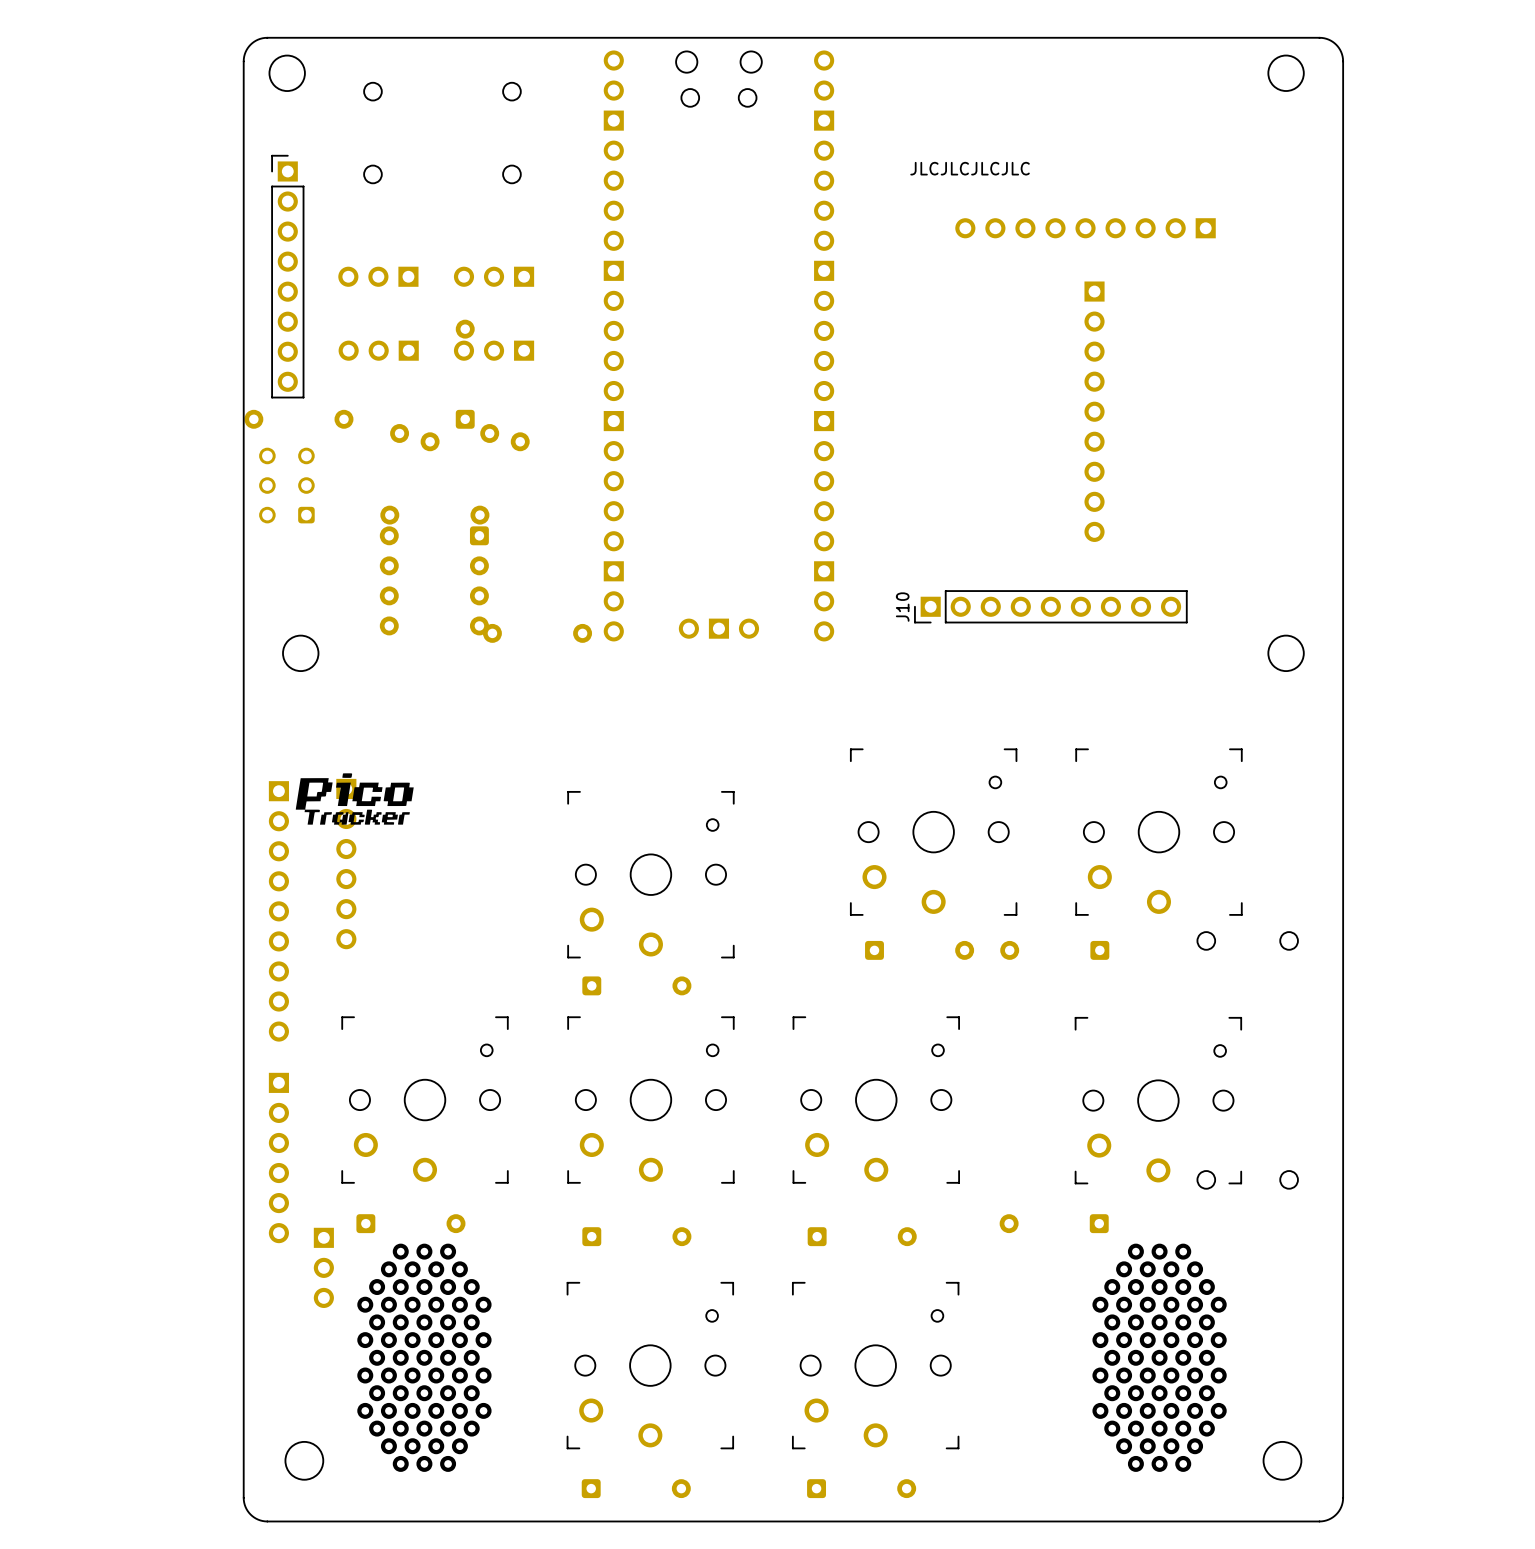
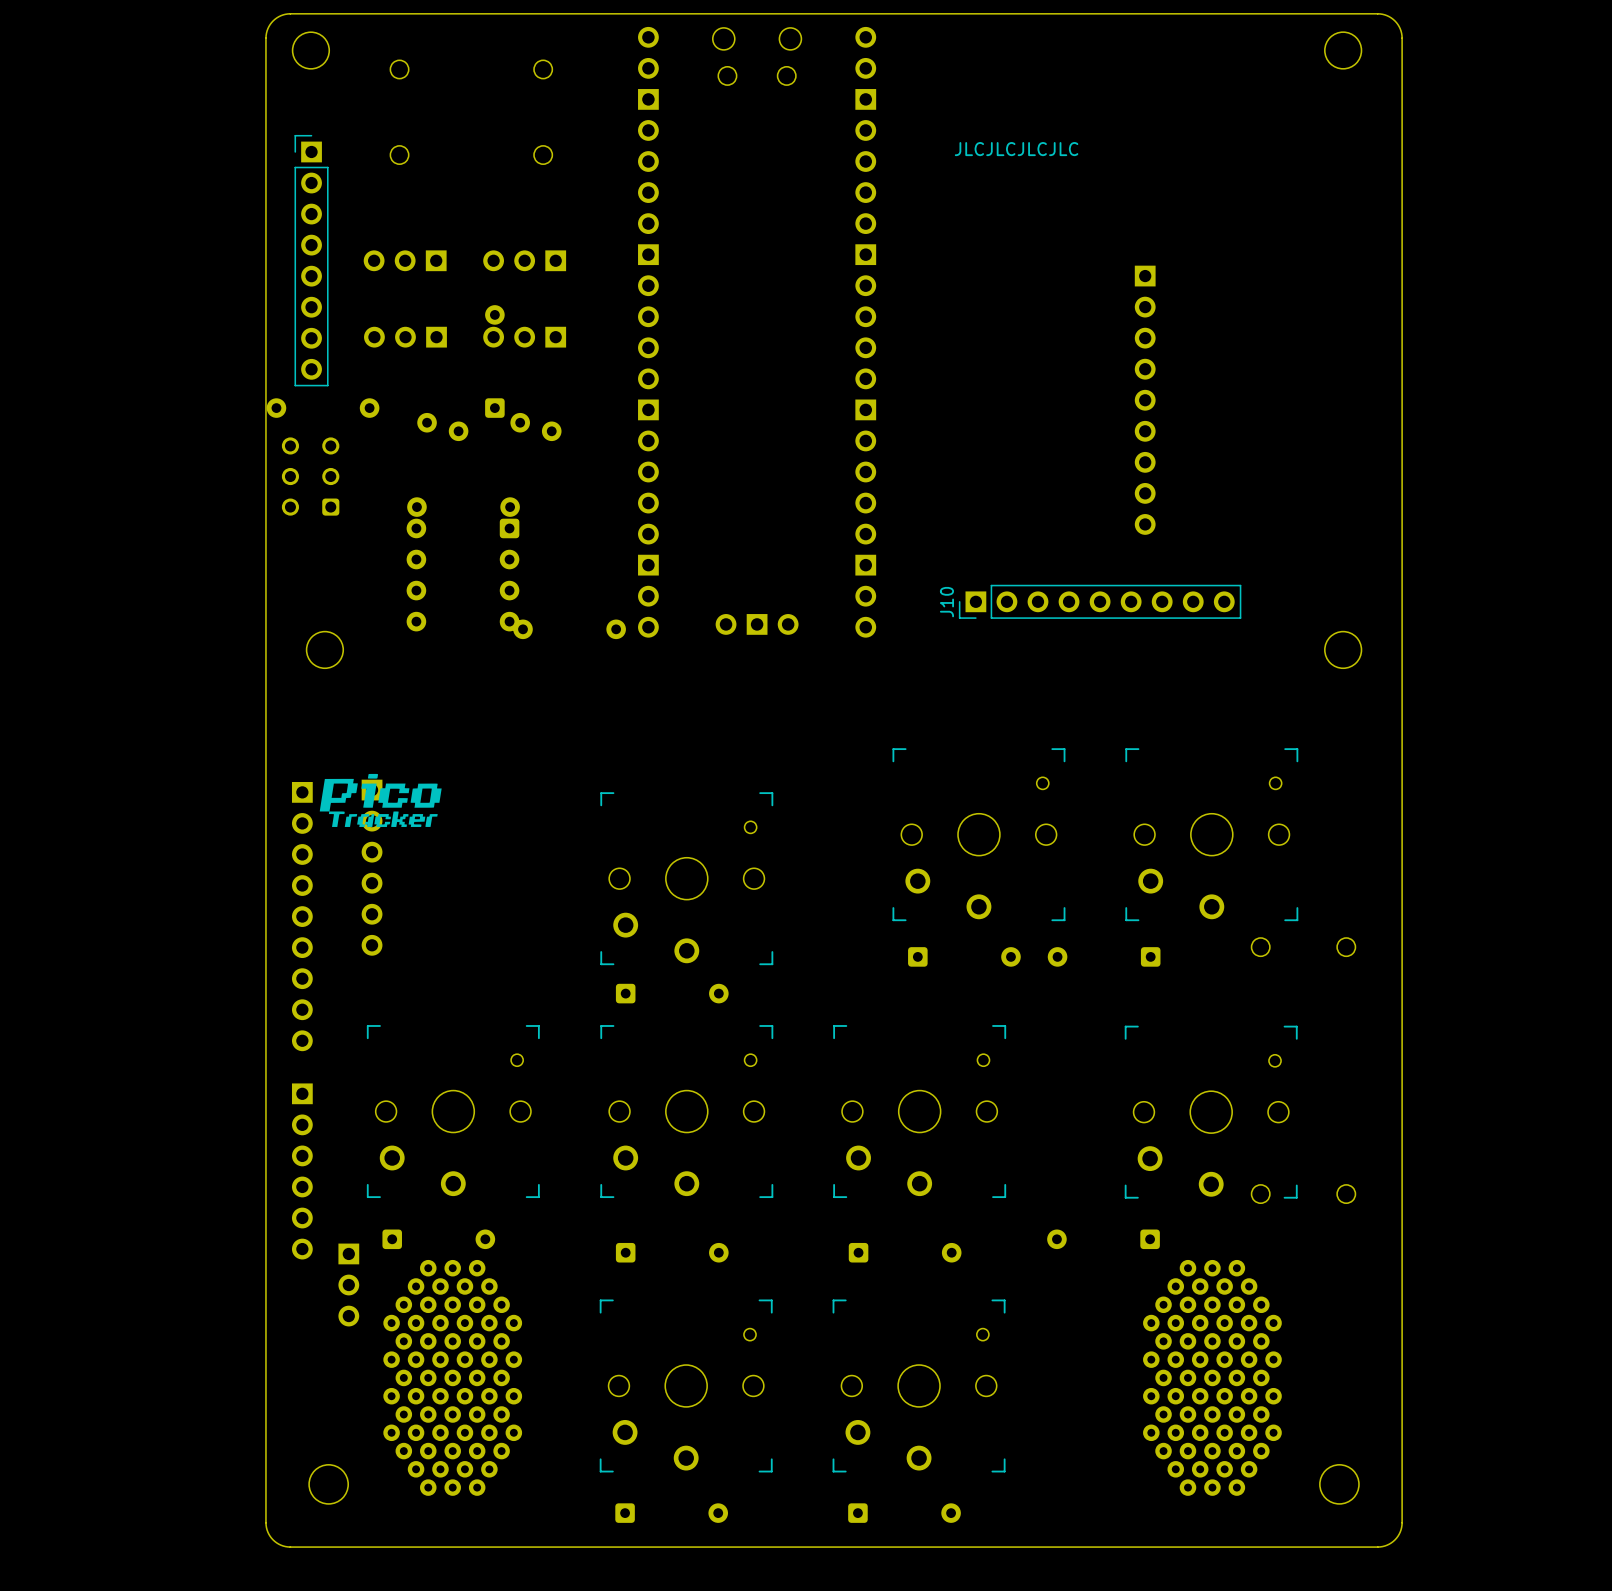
part: (1085, 228) -> none

